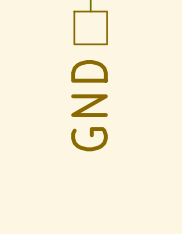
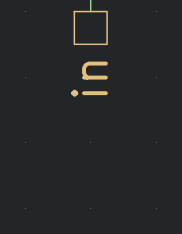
hierarchical label: GND (89, 105) -> in (89, 79)

